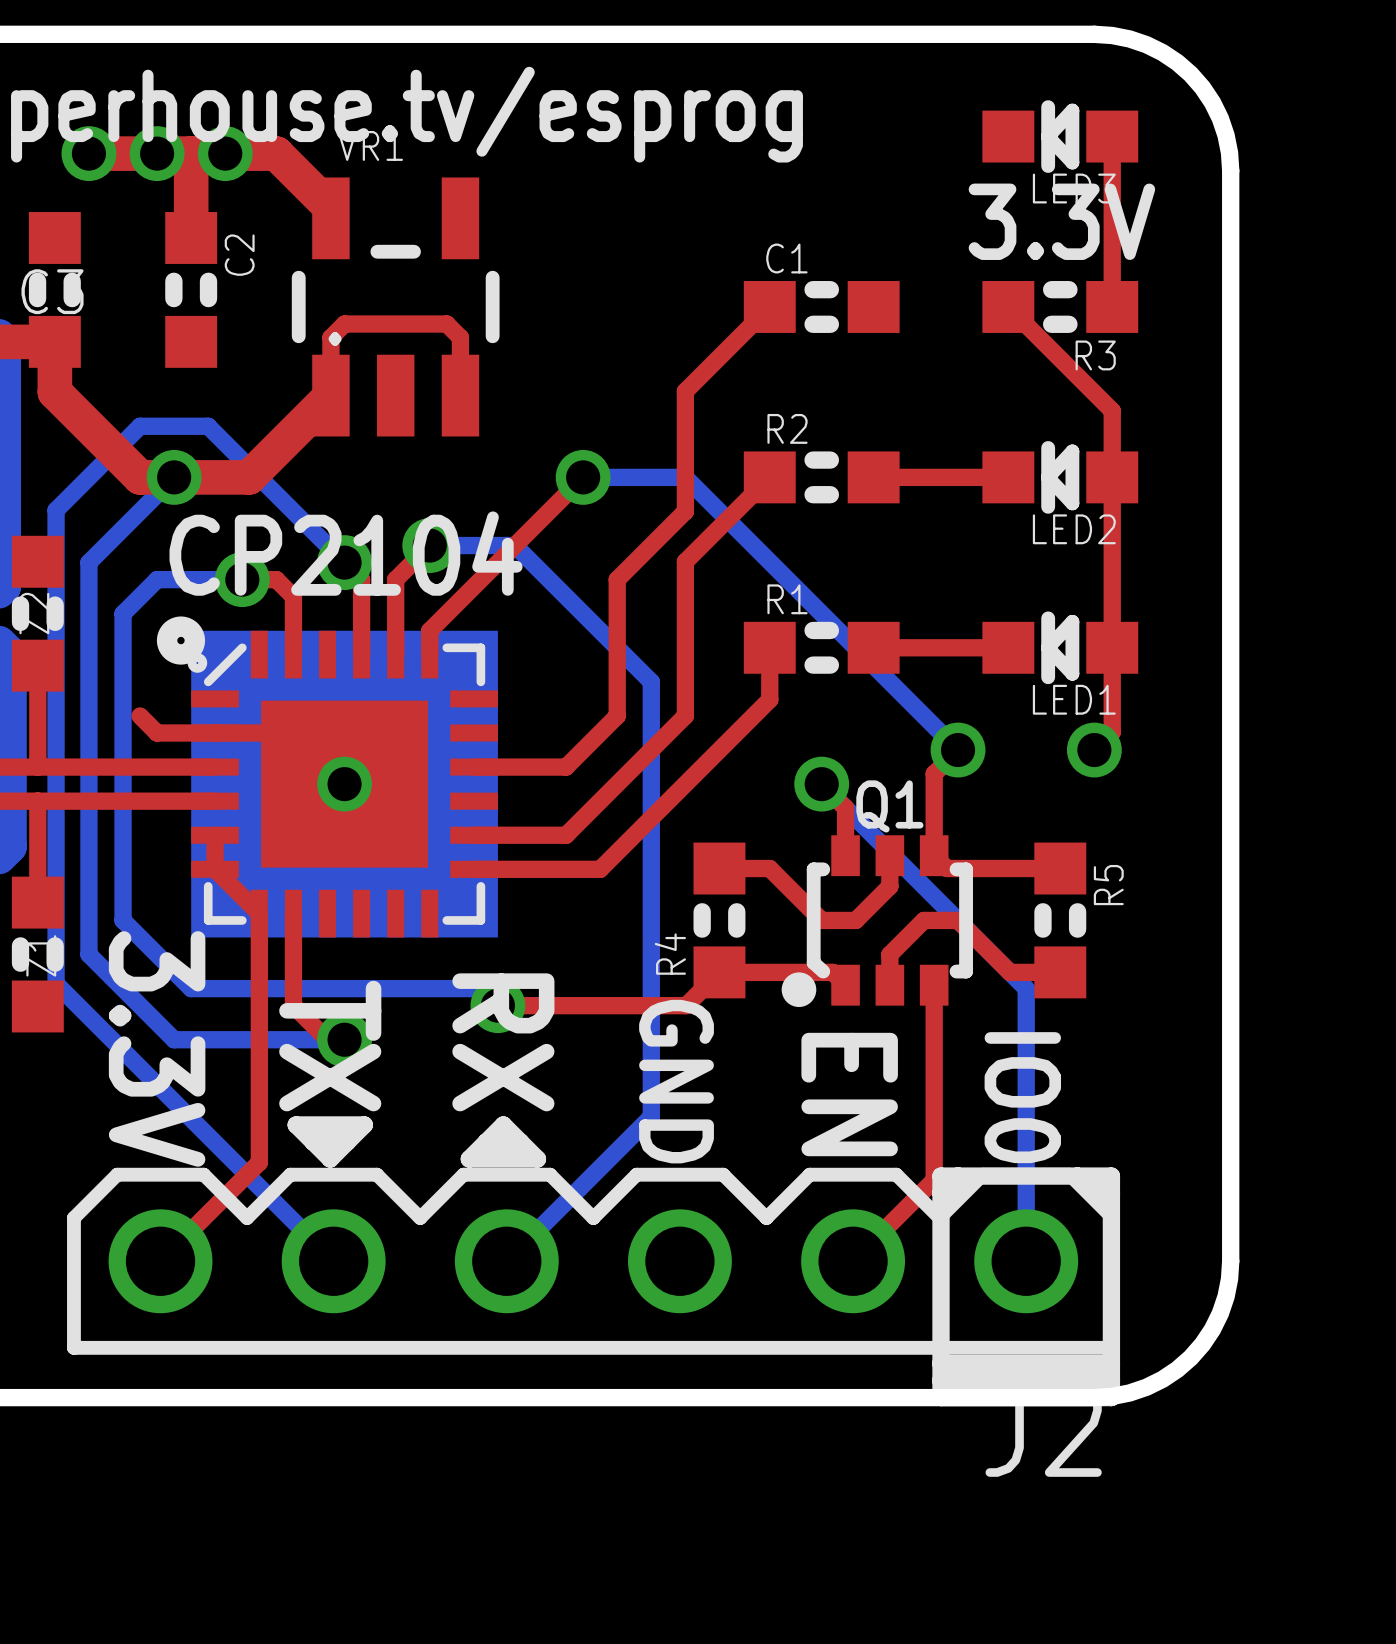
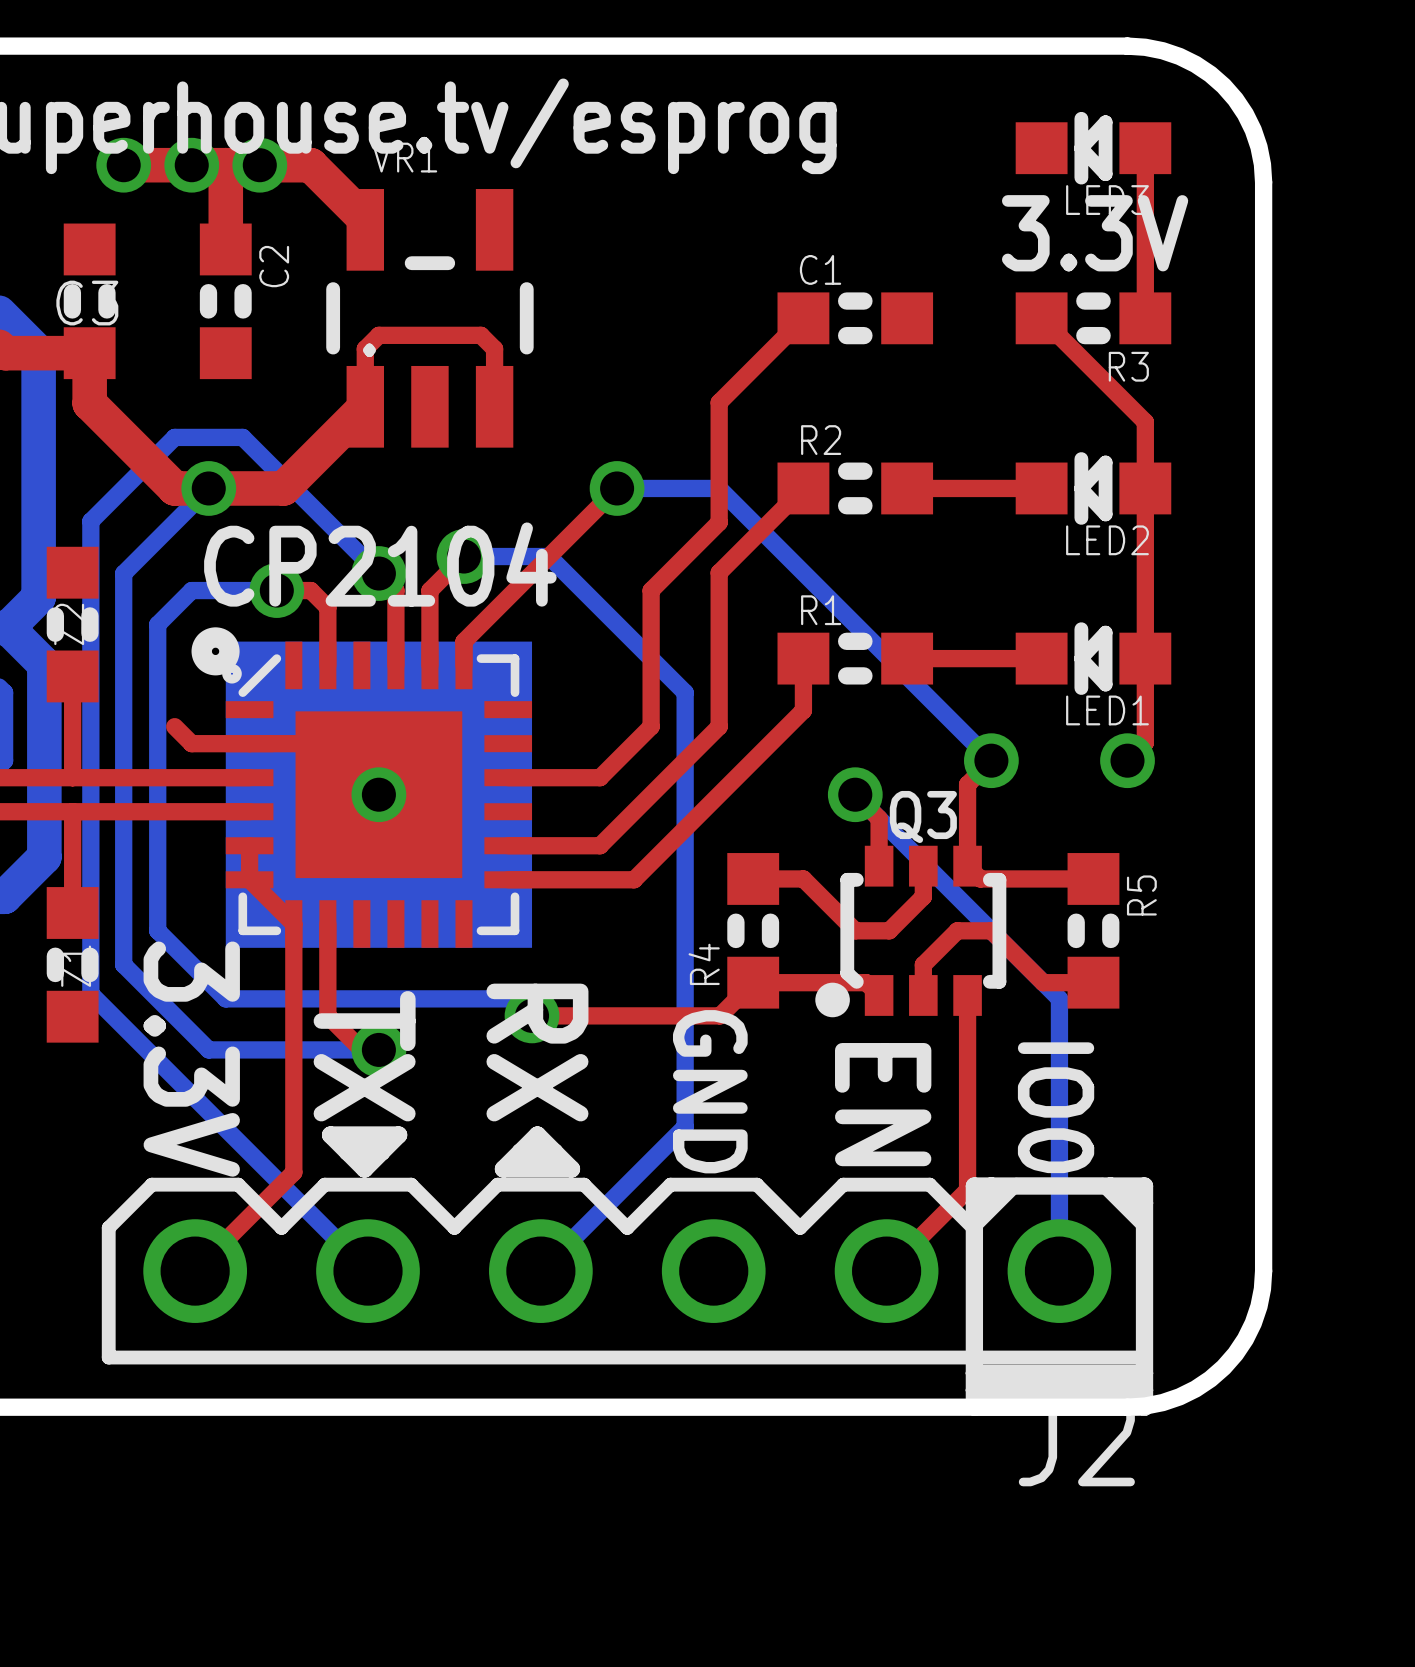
Q1 name: Q1 (889, 806) -> Q3 (923, 816)

